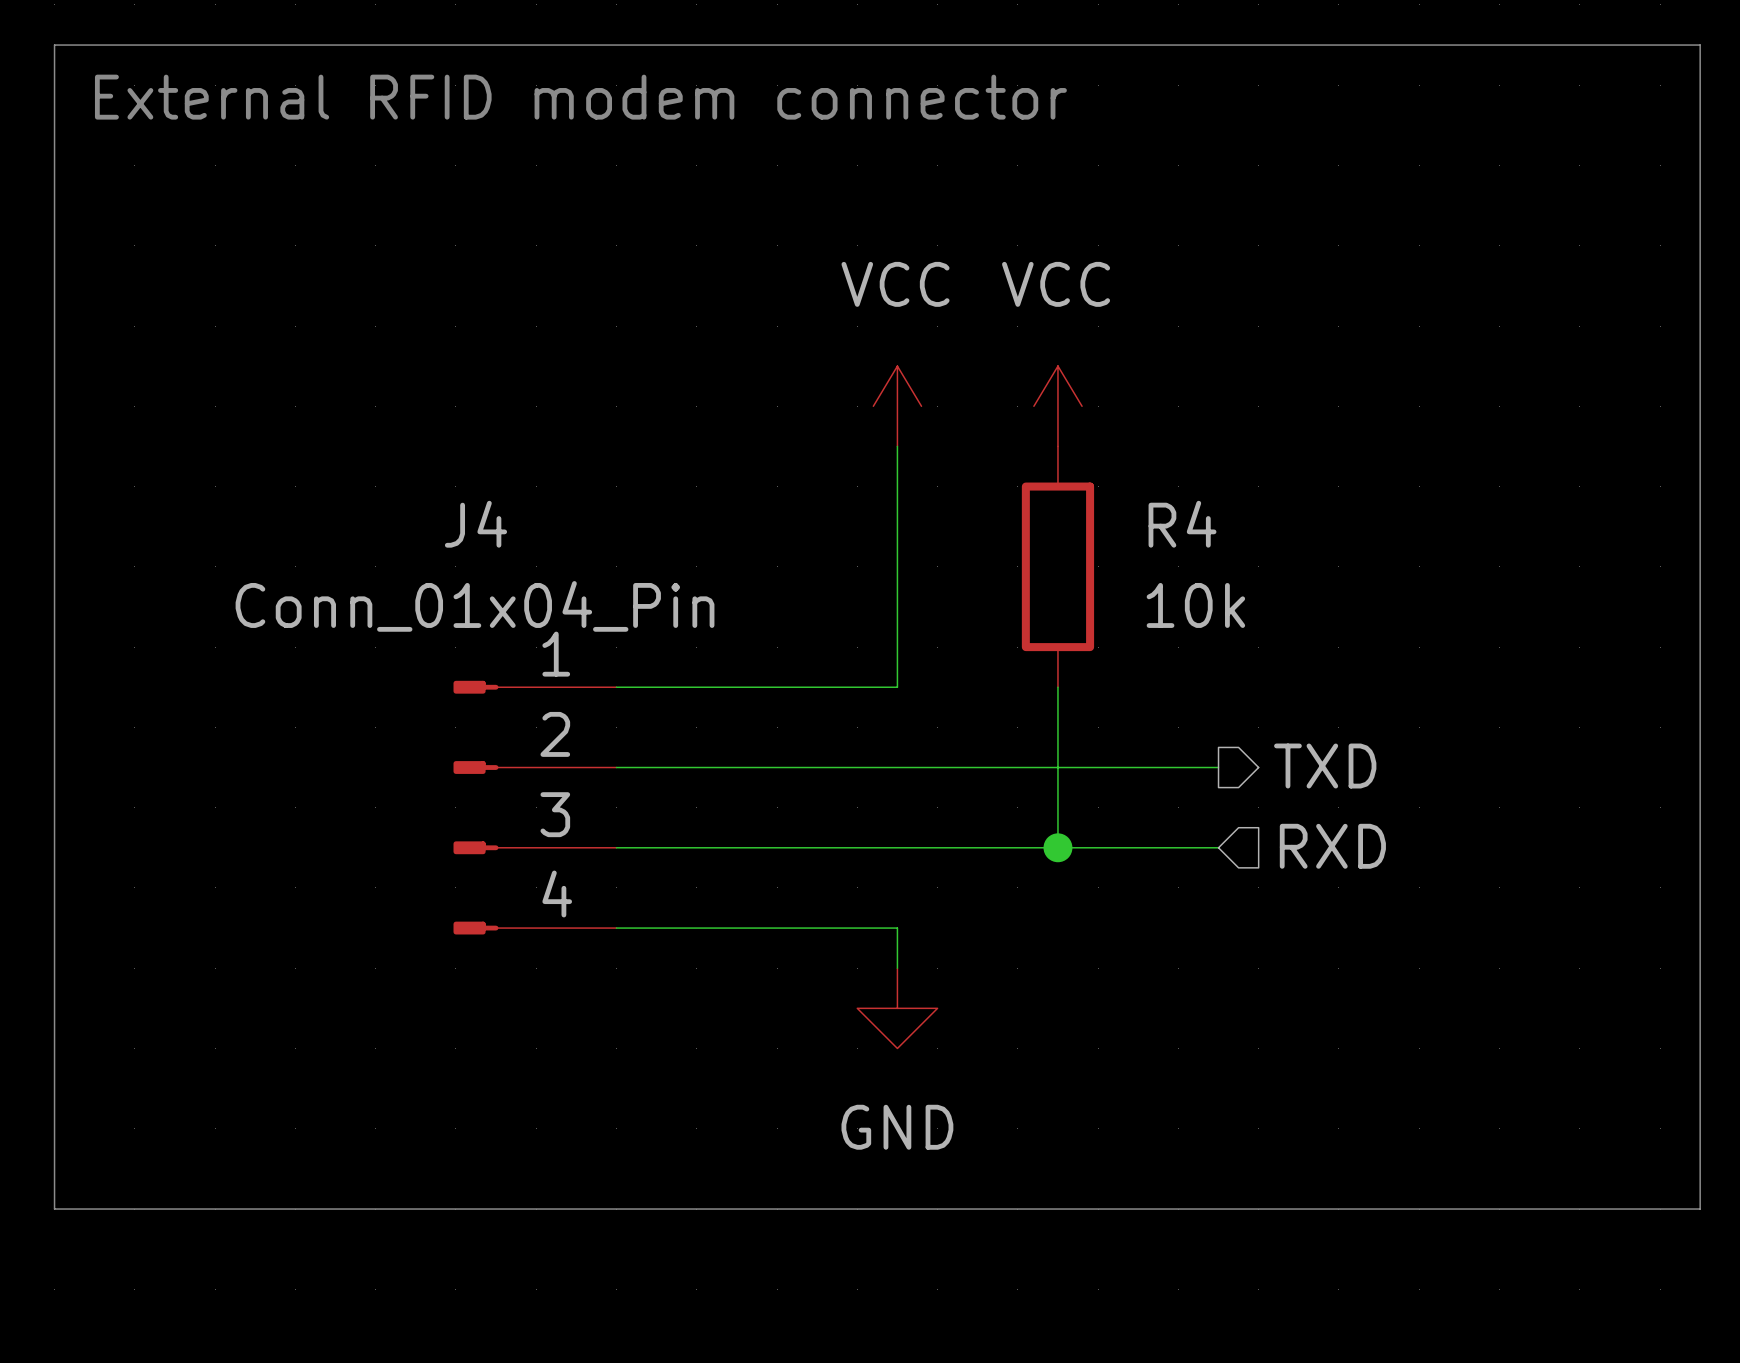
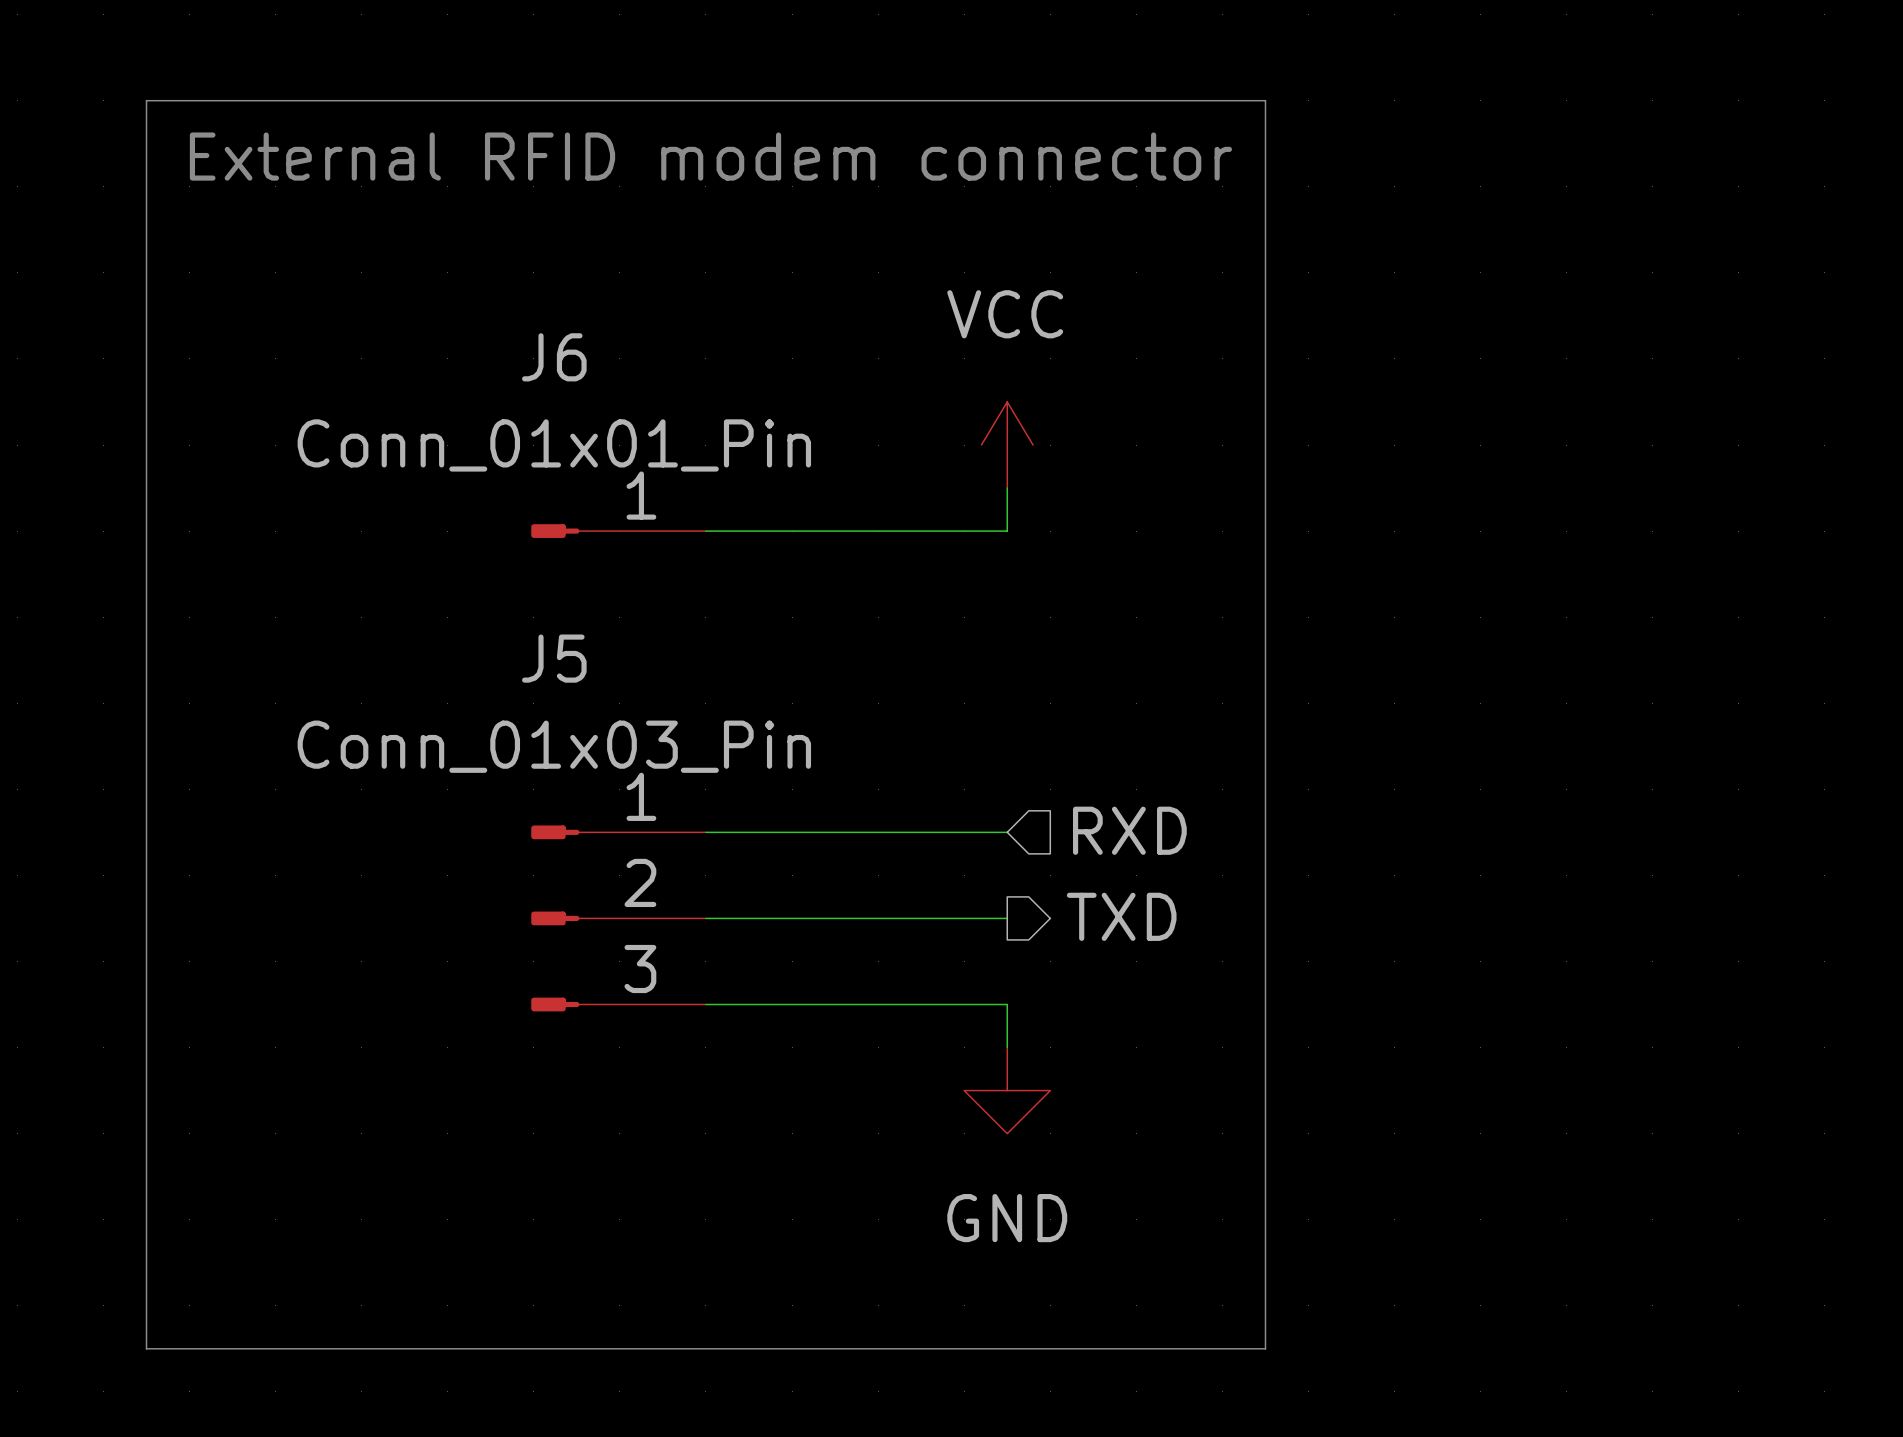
line: (54, 45) (1700, 45) (1700, 1209) (54, 1209) (54, 45) -> (146, 100) (146, 1348) (1265, 1348) (1265, 100) (146, 100)
text position: External RFID modem connector (580, 97) -> External RFID modem connector (710, 156)
power symbol: VCC (1057, 406) -> none
J6: none -> Conn_01x01_Pin (618, 531)
wire: (897, 486) (897, 687) (616, 687) -> (1007, 531) (705, 531)
R4: 10k (1057, 566) -> none
wire: (1057, 687) (1057, 847) -> none
hierarchical label position: TXD (1325, 766) -> TXD (1121, 916)
wire: (897, 767) (1218, 767) -> none
J4: Conn_01x04_Pin (534, 807) -> none
hierarchical label position: RXD (1332, 846) -> RXD (1129, 830)
J5: none -> Conn_01x03_Pin (618, 918)
wire: (897, 847) (1218, 847) -> none
junction: (1057, 847) -> none

